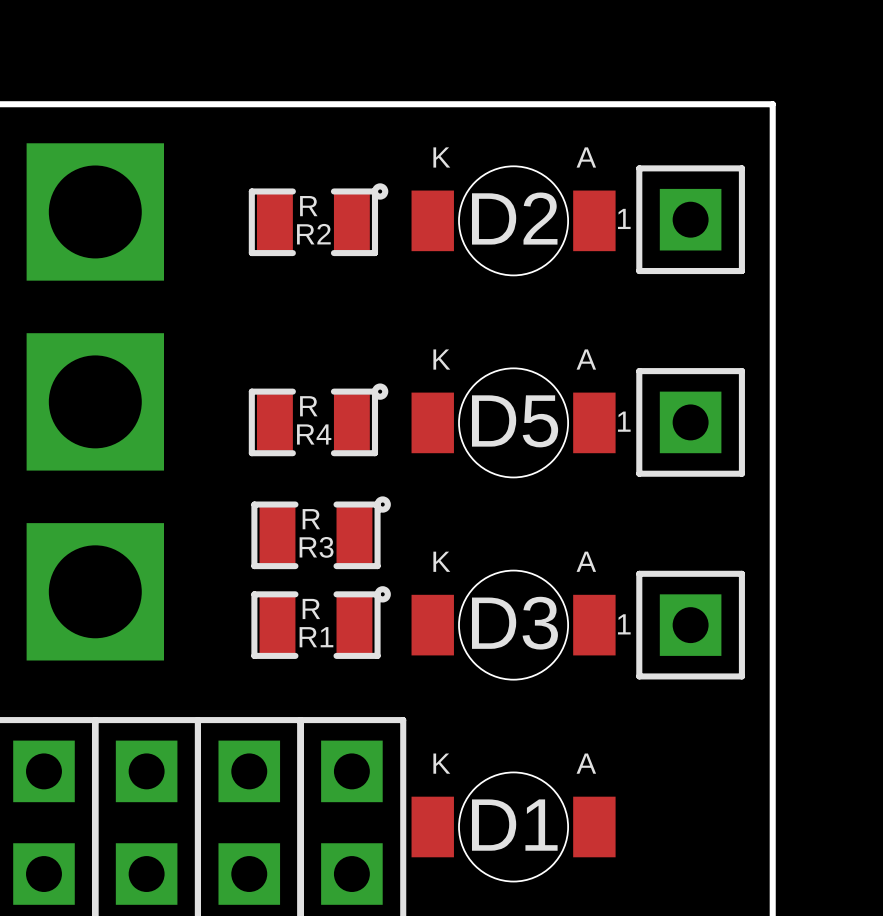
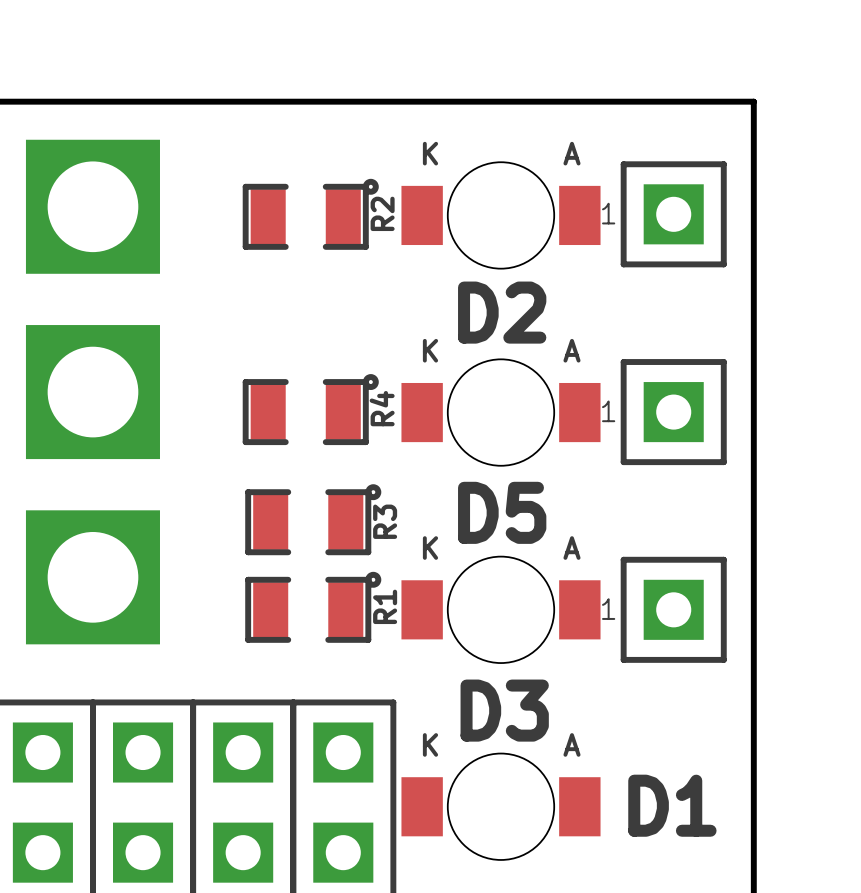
R2 value: R (308, 206) -> none
D2 name position: D2 (514, 218) -> D2 (502, 312)
R2 name rotation: 0° (313, 234) -> 90° counterclockwise (382, 213)
R2 name position: R2 (313, 234) -> R2 (382, 213)
R4 value: R (308, 406) -> none
D5 name position: D5 (515, 421) -> D5 (502, 512)
R4 name rotation: 0° (314, 434) -> 90° counterclockwise (382, 408)
R4 name position: R4 (314, 434) -> R4 (382, 408)
R3 value: R (311, 519) -> none
R3 name rotation: 0° (316, 547) -> 90° counterclockwise (385, 521)
R3 name position: R3 (316, 547) -> R3 (385, 521)
R1 value: R (311, 608) -> none
D3 name position: D3 (514, 623) -> D3 (504, 710)
R1 name rotation: 0° (316, 637) -> 90° counterclockwise (385, 606)
R1 name position: R1 (316, 637) -> R1 (385, 606)
D1 name position: D1 (514, 825) -> D1 (672, 805)

